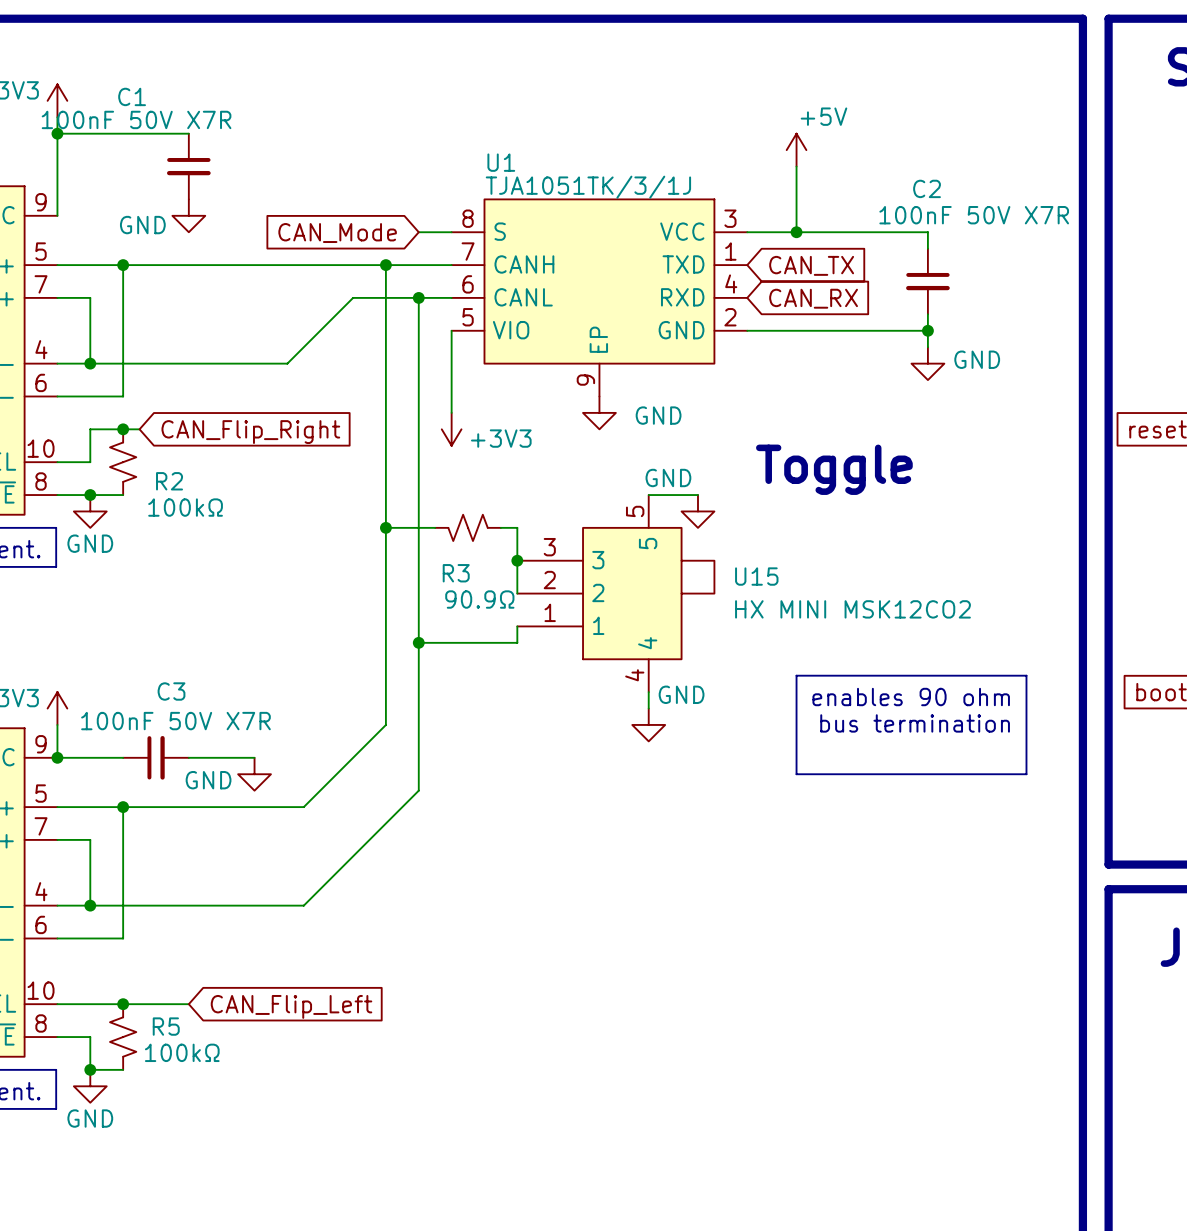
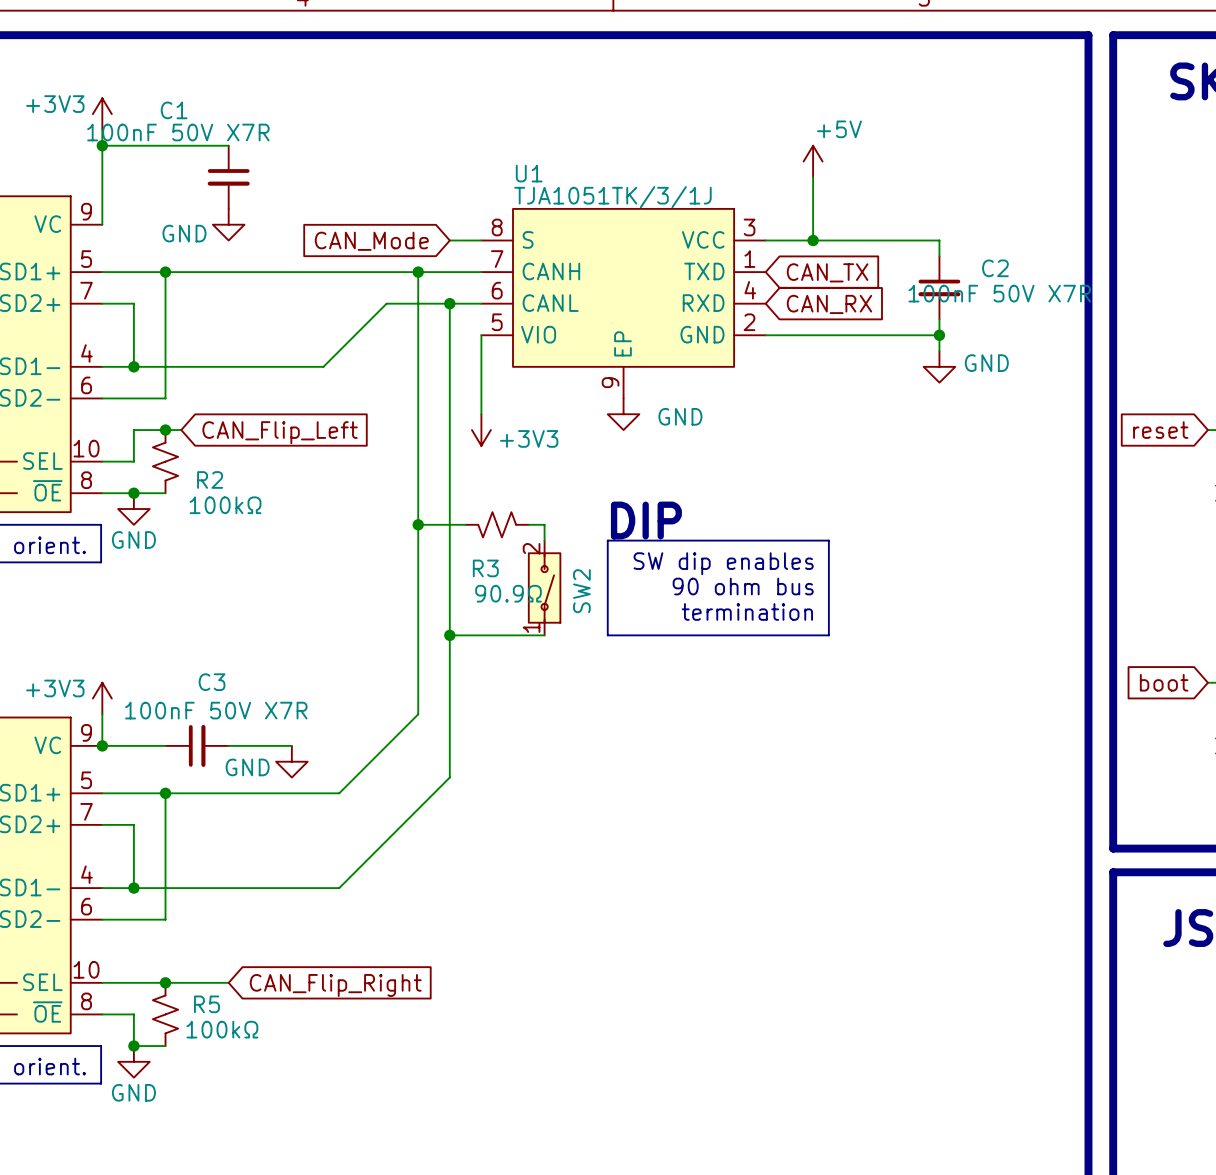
C2 name position: C2 (927, 188) -> C2 (995, 268)
C2 value position: 100nF 50V X7R (974, 215) -> 100nF 50V X7R (999, 293)
global label: CAN_Flip_Right (250, 432) -> CAN_Flip_Left (280, 432)
text: Toggle (834, 469) -> none
wire: (648, 495) (697, 495) -> none
power symbol: GND (697, 511) -> none
text: none -> DIP (646, 520)
junction: (517, 560) -> none
text: none -> SW dip enables (723, 563)
text: none -> 90 ohm bus (743, 586)
SW2: none -> (544, 587)
U15: HX MINI MSK12CO2 (615, 593) -> none
text: none -> termination (747, 611)
line: (796, 675) (1026, 675) (1026, 774) (796, 774) (796, 675) -> (607, 540) (828, 540) (828, 635) (607, 635) (607, 540)
wire: (648, 692) (648, 708) -> none
text: enables 90 ohm (911, 697) -> none
text: bus termination (915, 723) -> none
power symbol: GND (648, 724) -> none
global label: CAN_Flip_Left (291, 1006) -> CAN_Flip_Right (335, 985)

